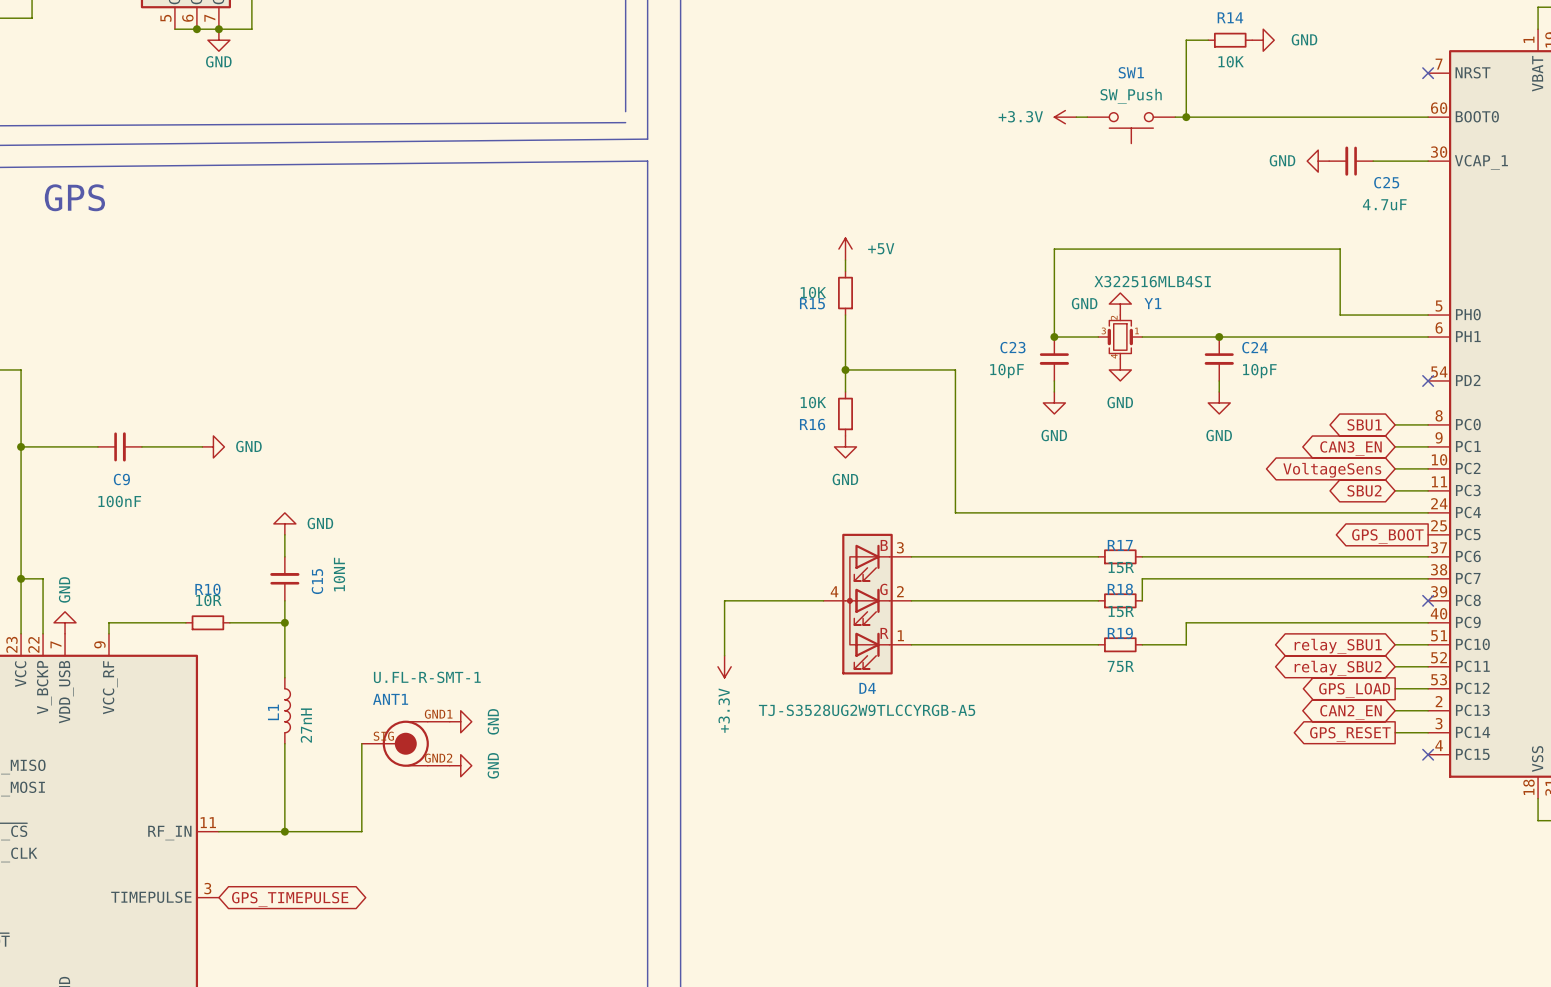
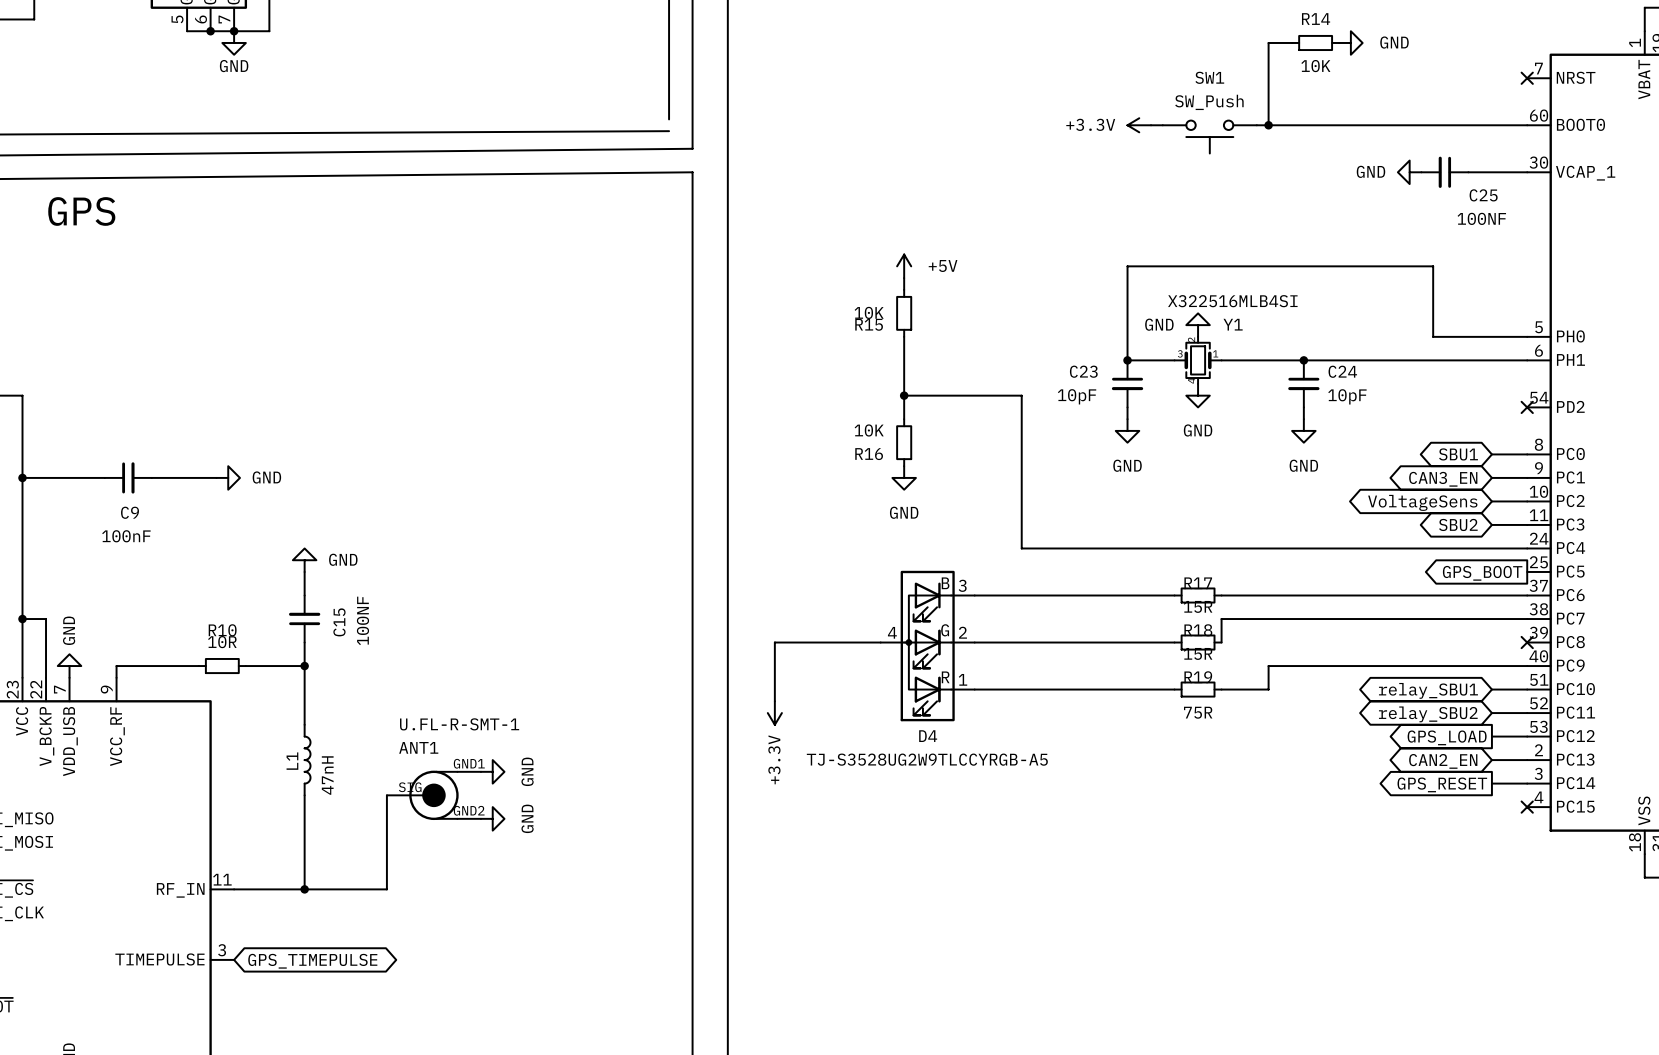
C25 value: 4.7uF (1384, 204) -> 100NF (1481, 218)
C15 value: 10NF (339, 574) -> 100NF (362, 620)
L1 value: 27nH (306, 725) -> 47nH (327, 775)

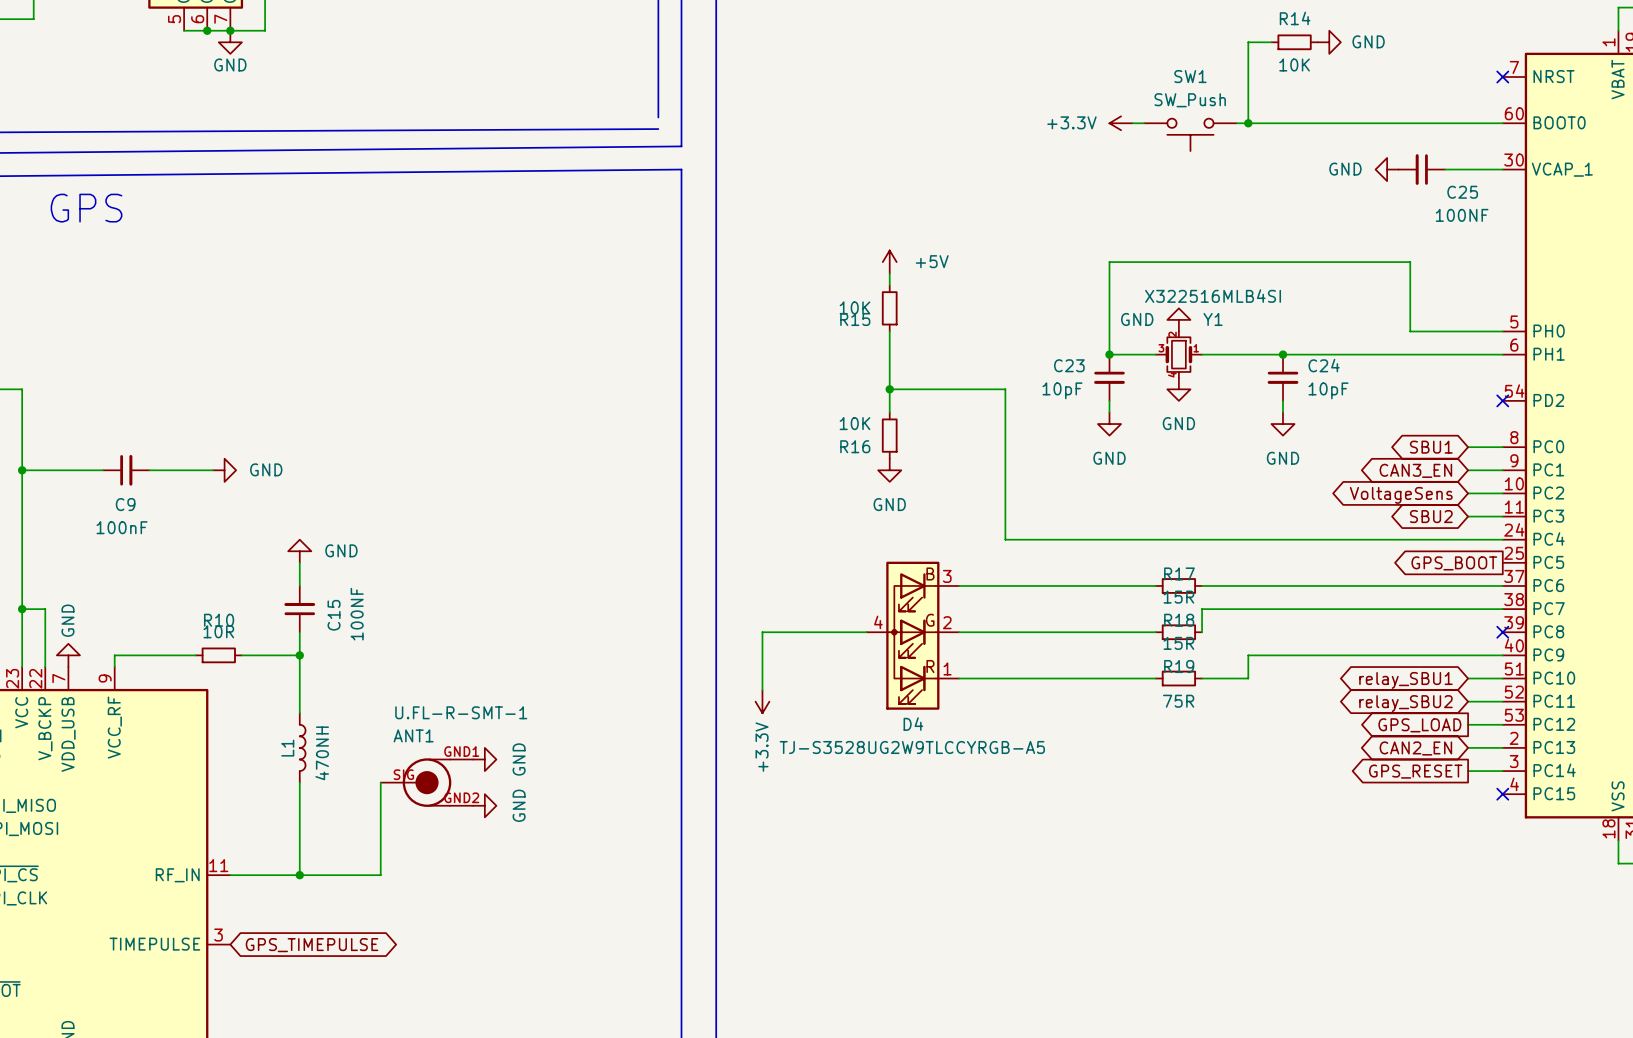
L1 value: 47nH (327, 775) -> 470NH (322, 753)

